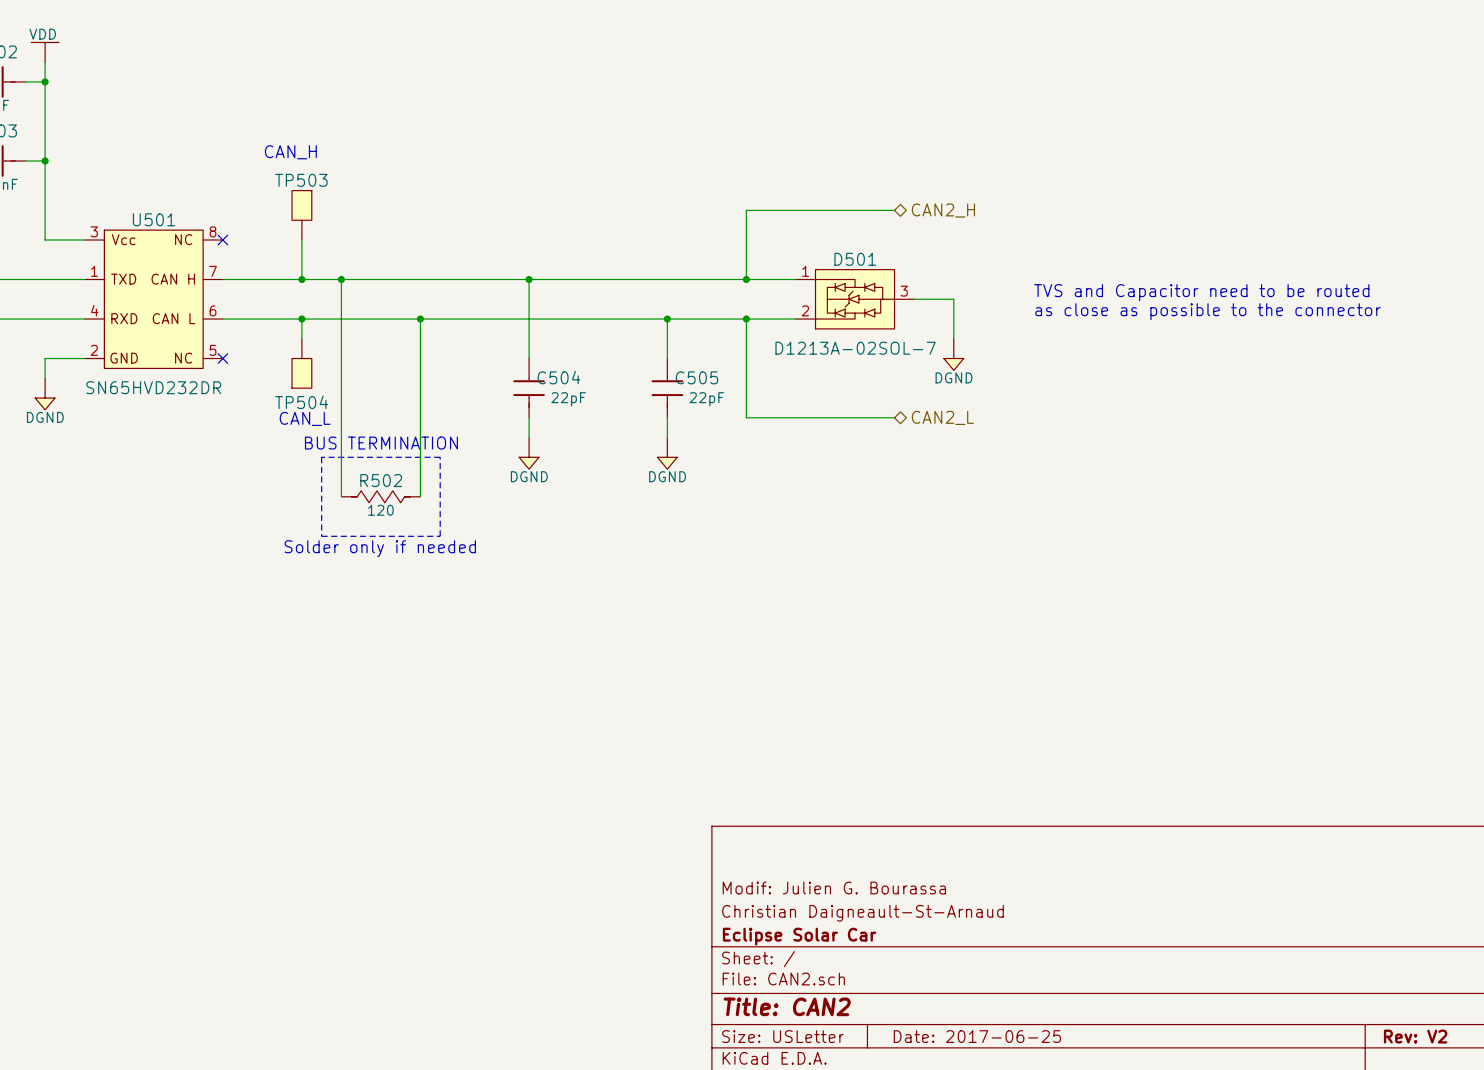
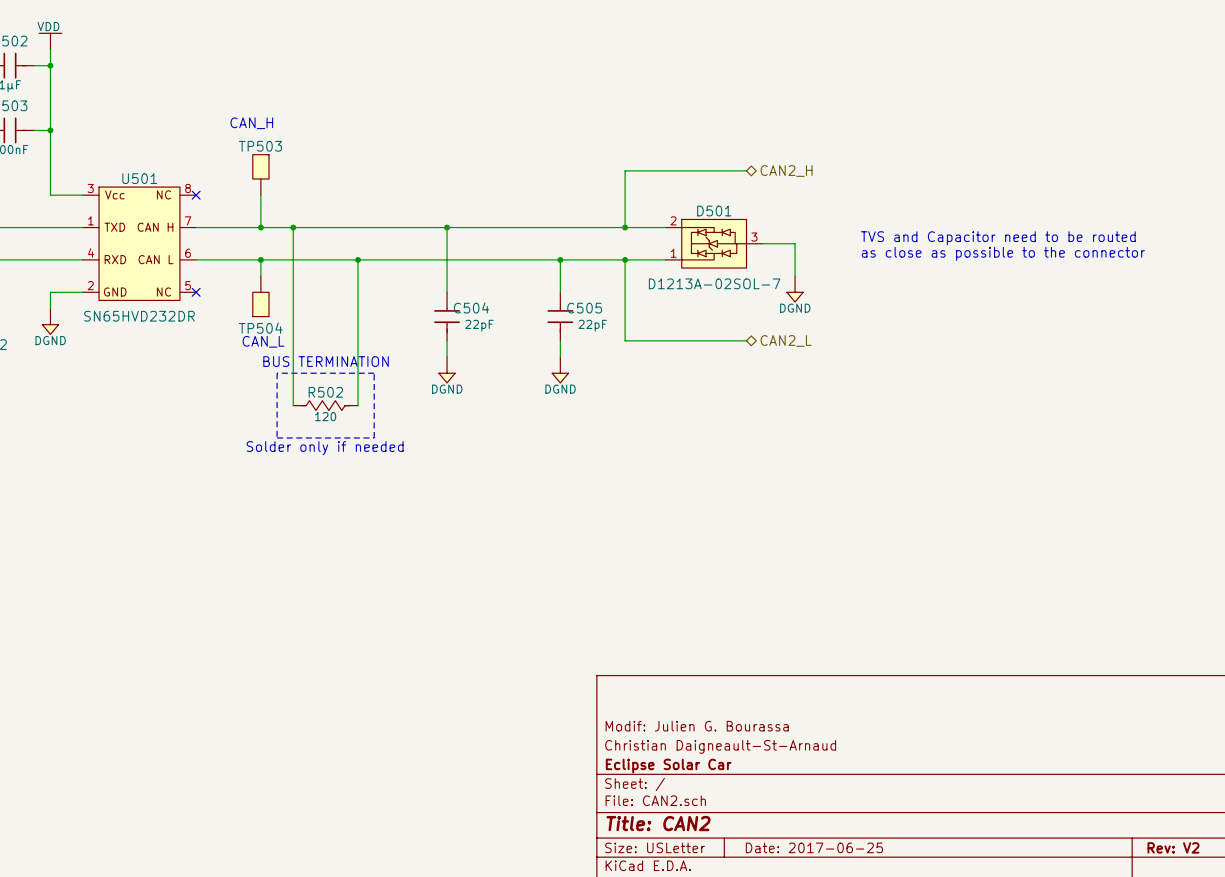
D501 flip: as is (855, 299) -> up-down (714, 243)

